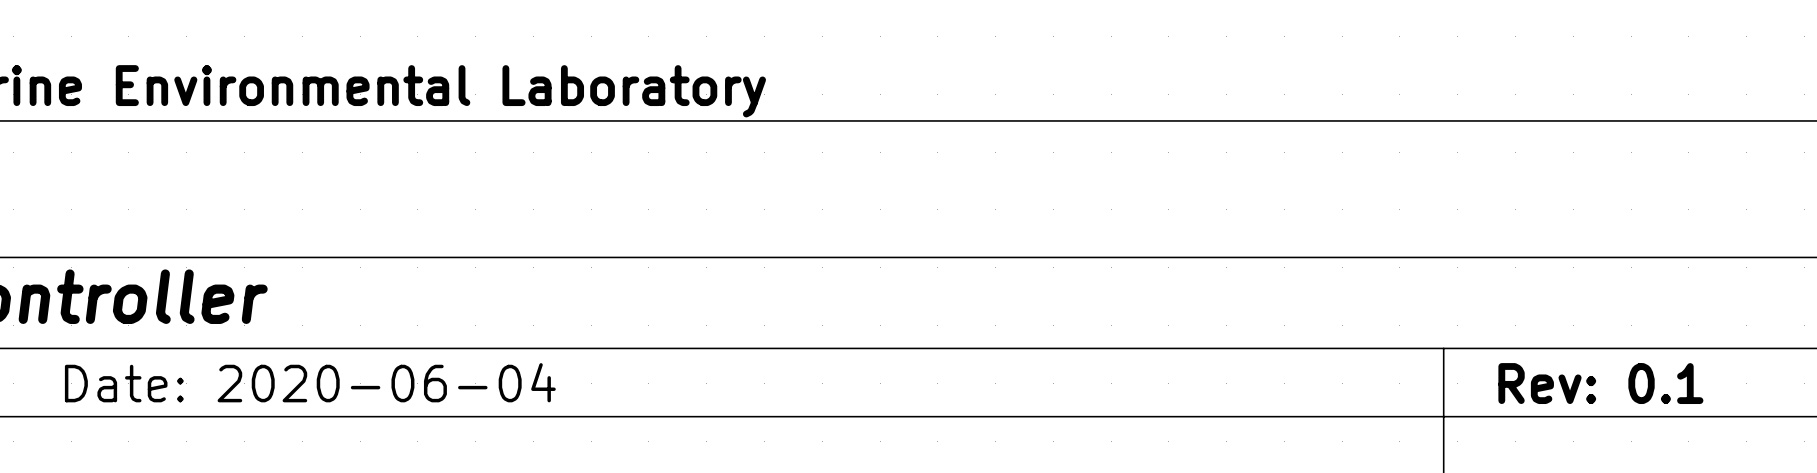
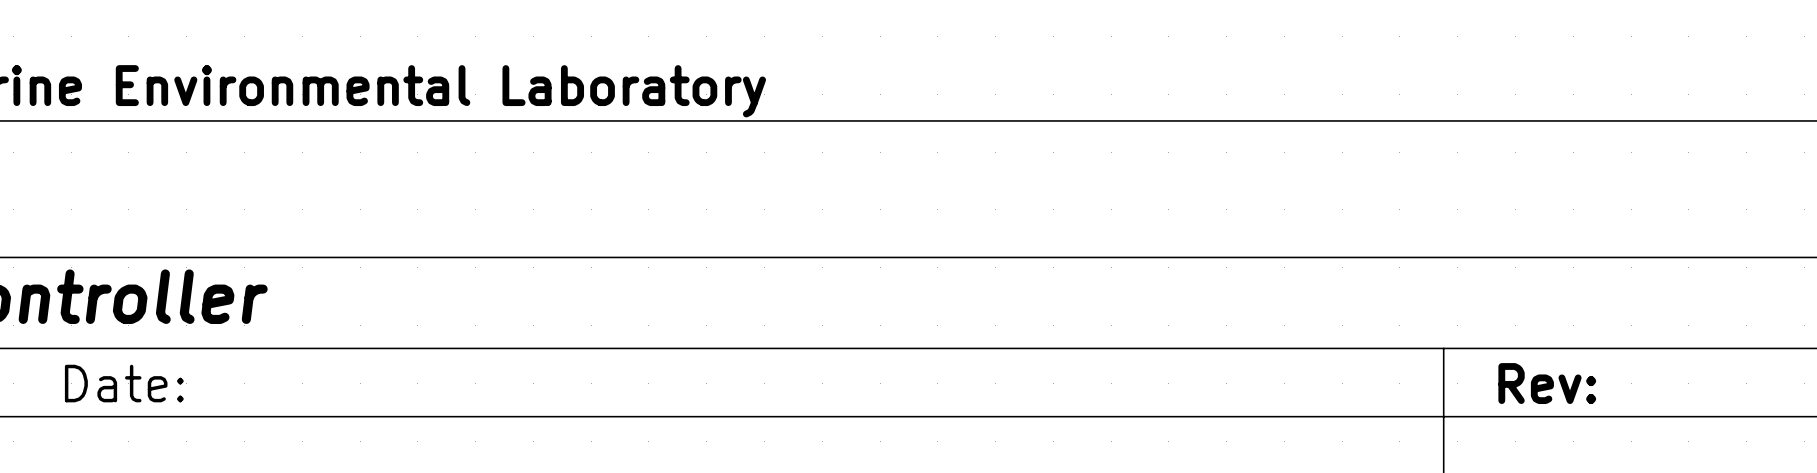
title block: Date: 2020-06-04 (310, 382) -> Date: (124, 383)
title block: Rev: 0.1 (1600, 383) -> Rev: (1547, 383)

